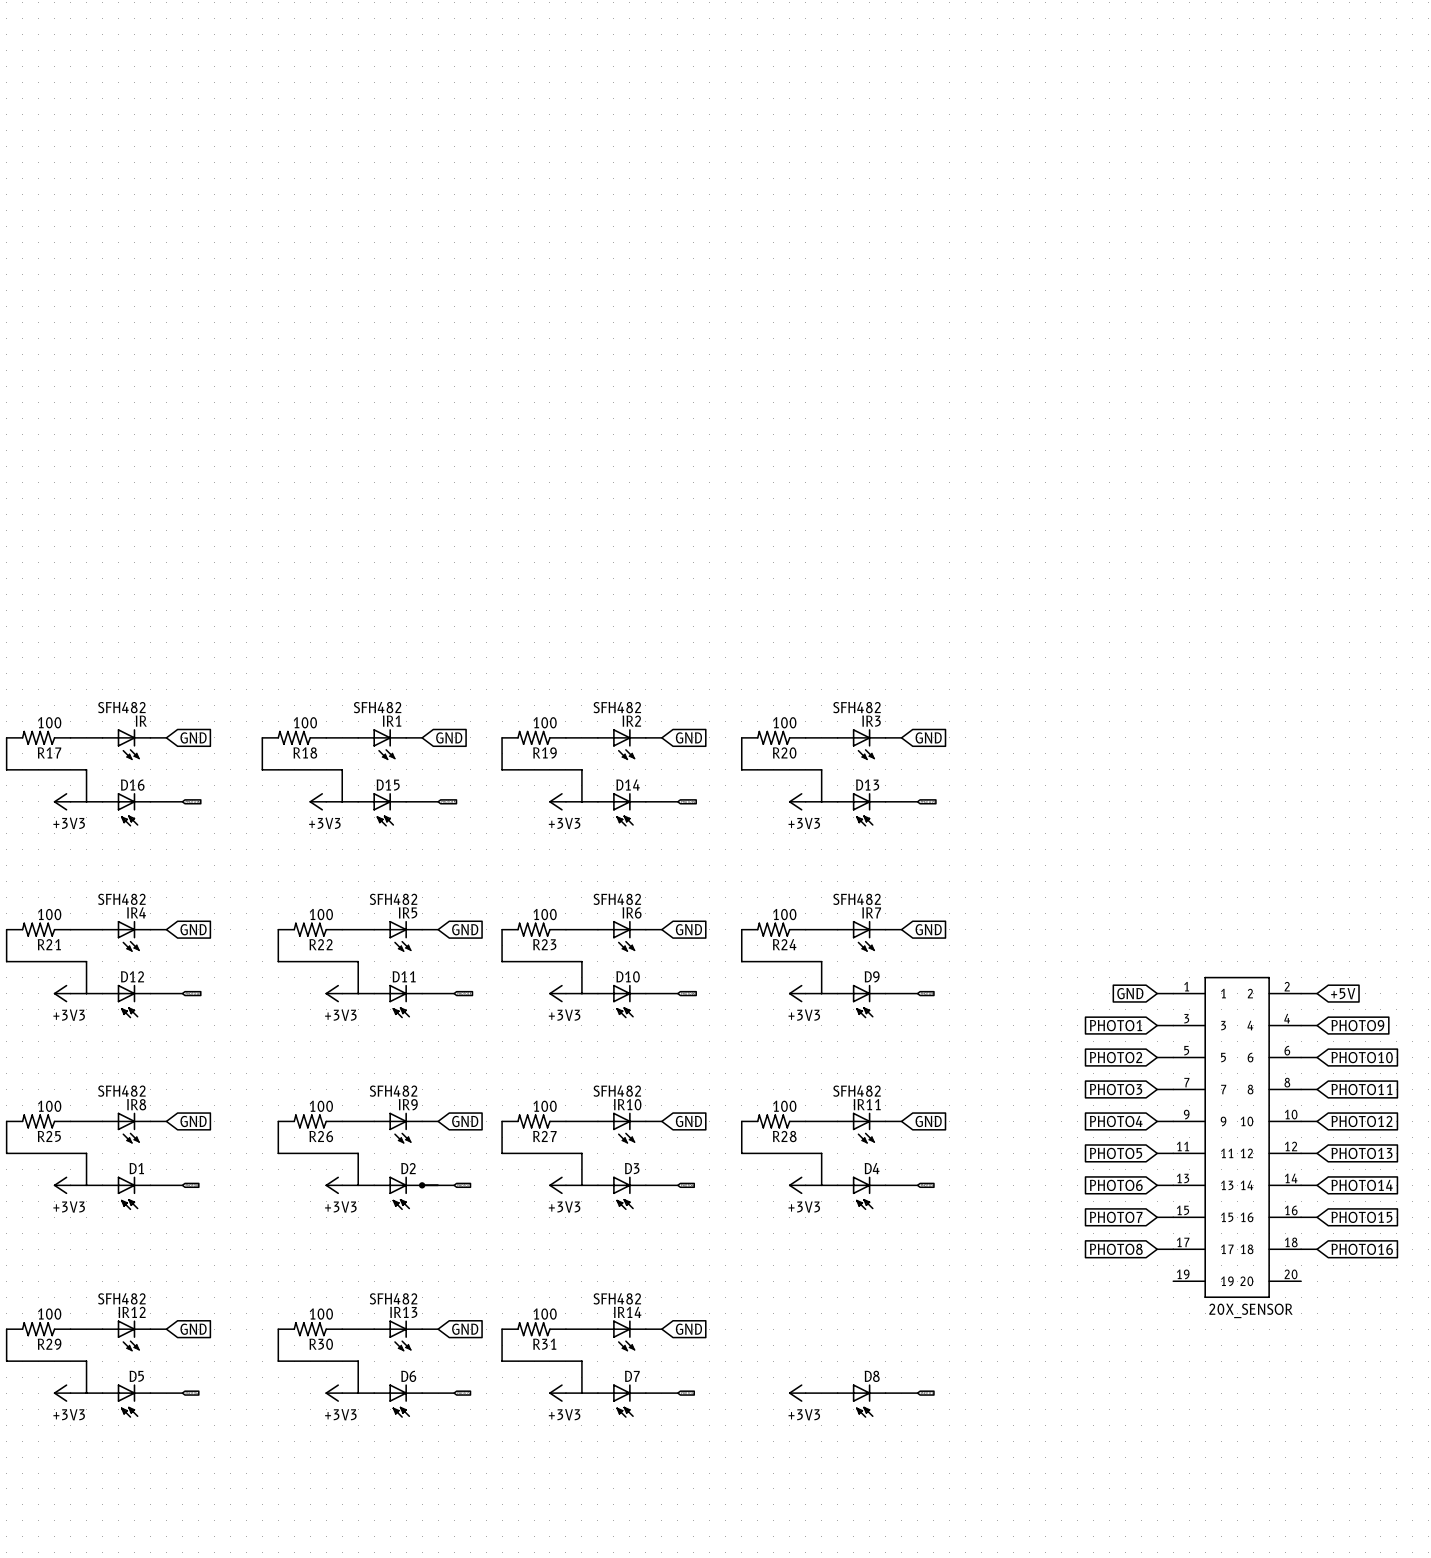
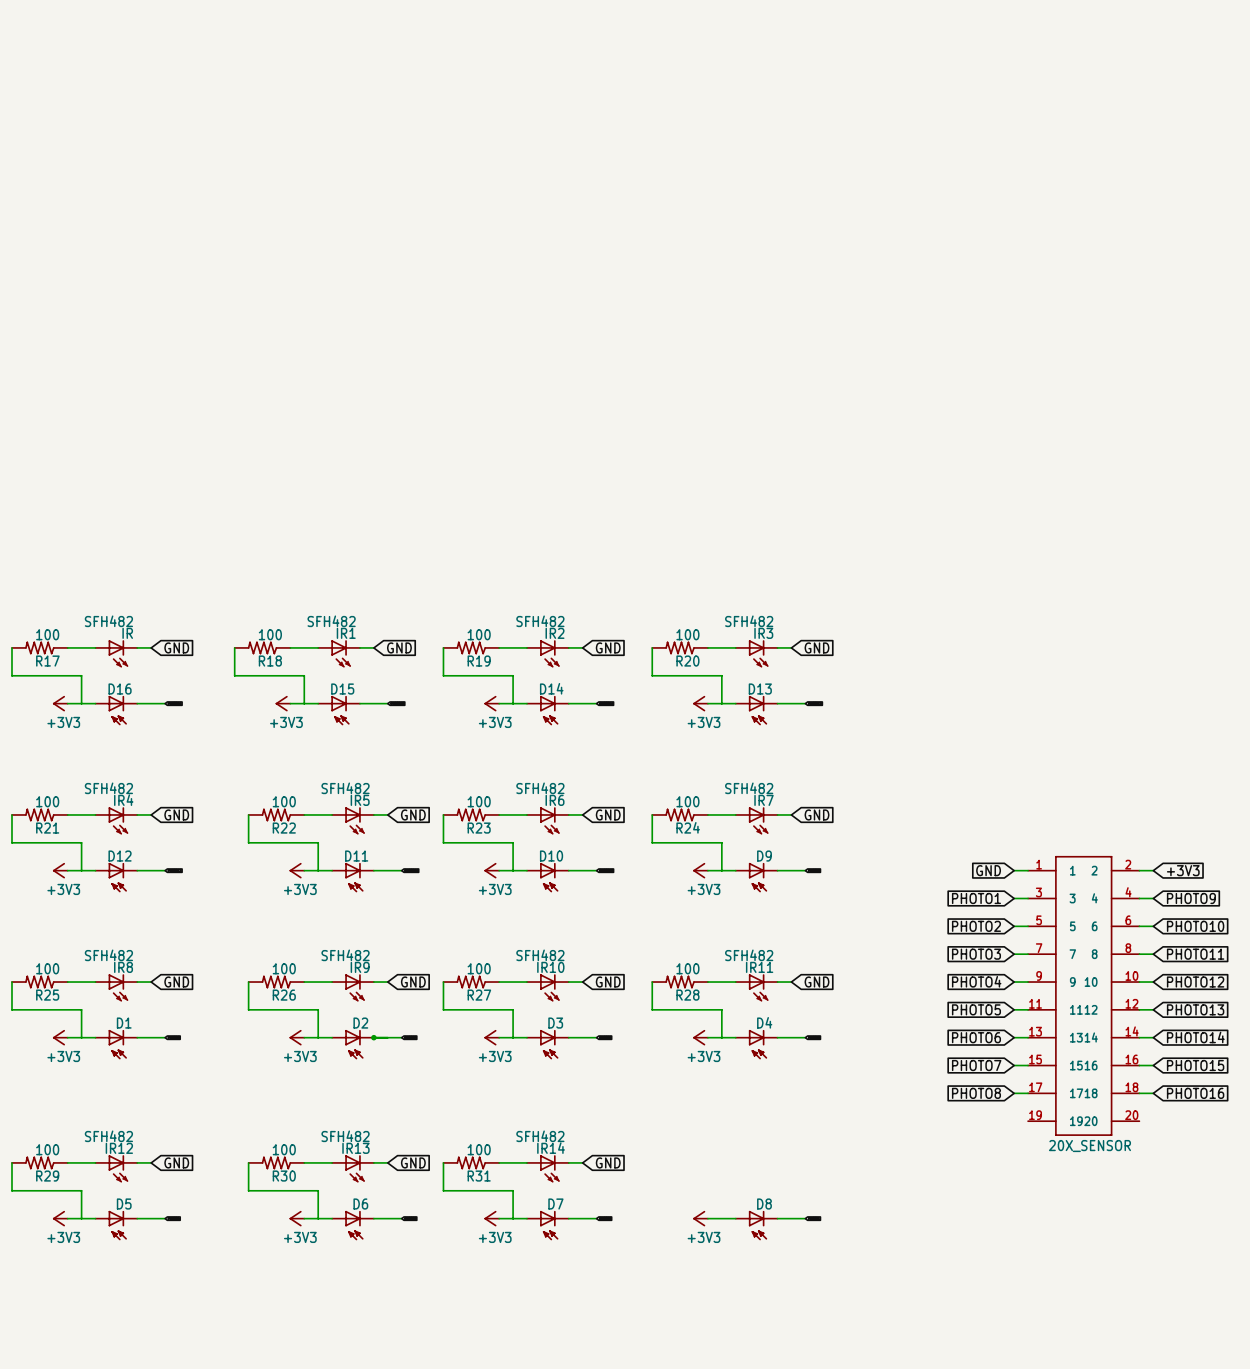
global label: +5V (1343, 993) -> +3V3 (1183, 870)

